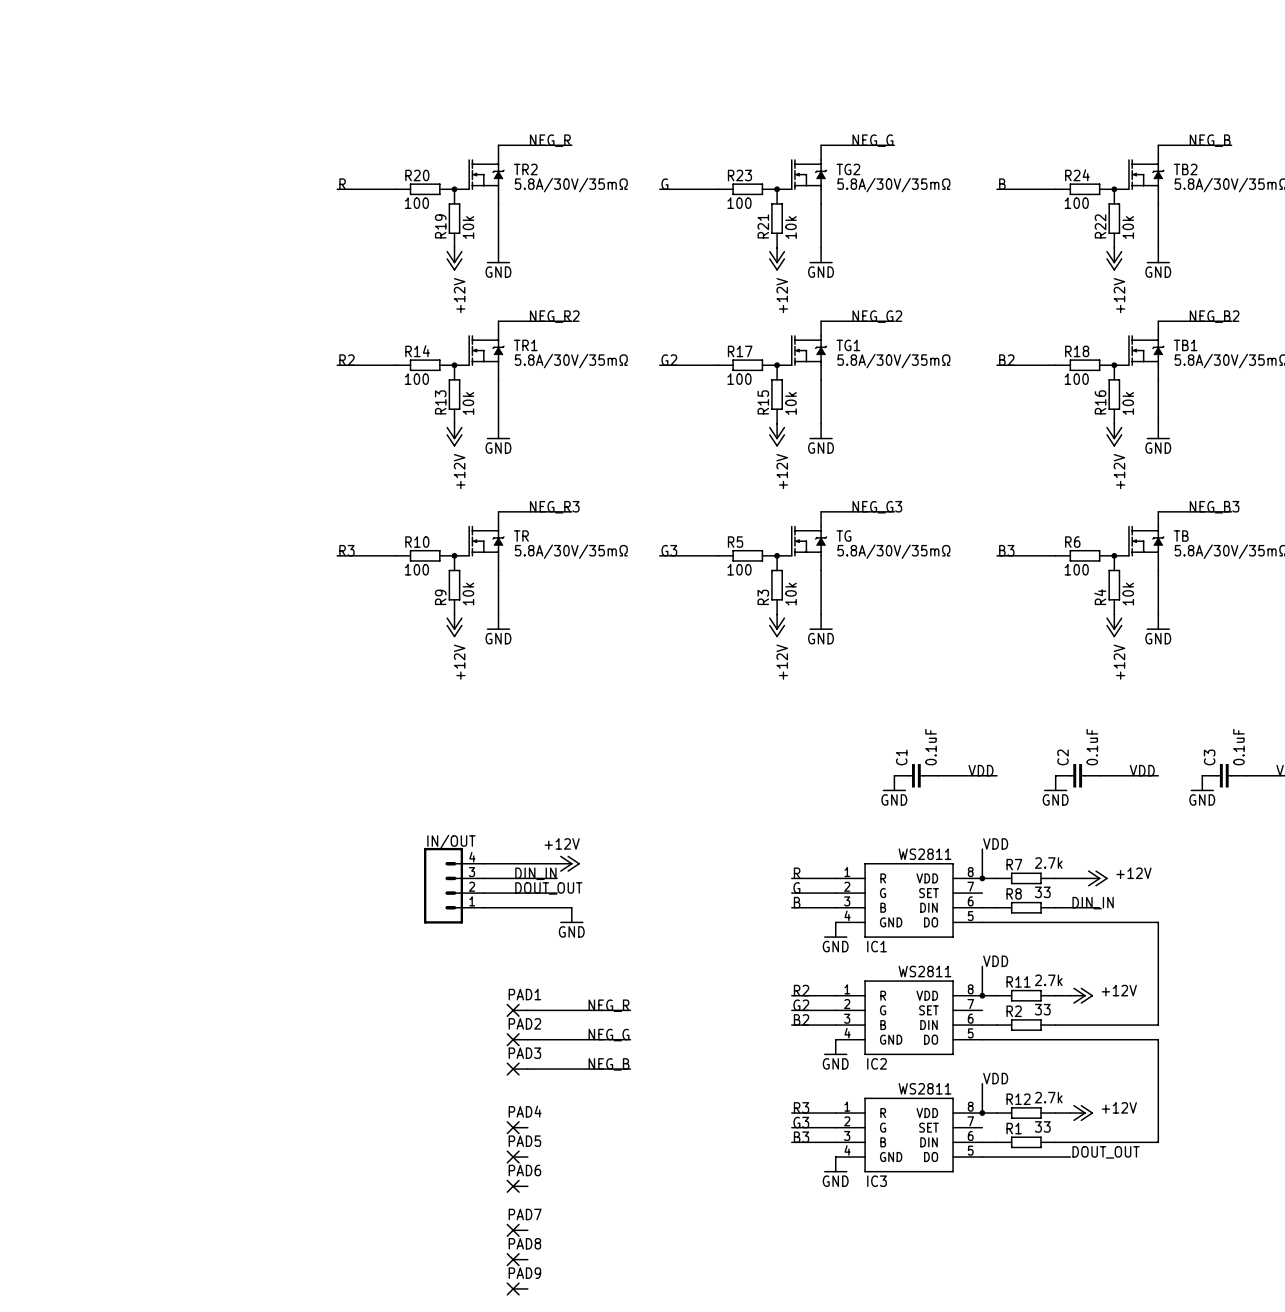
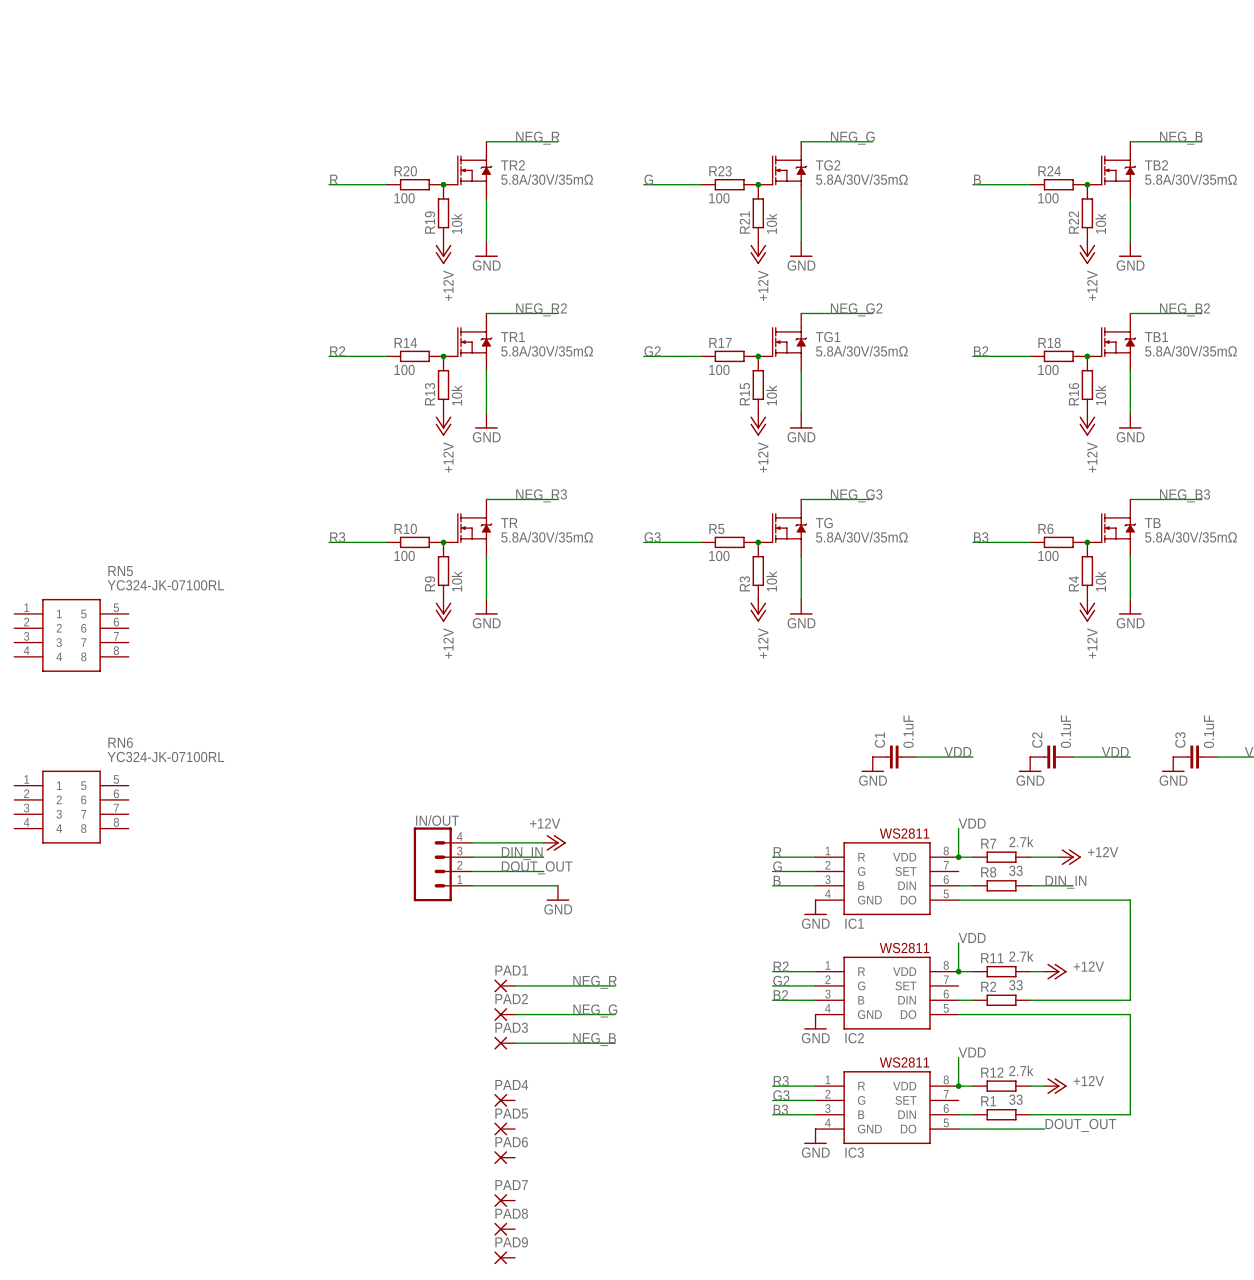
RN5: none -> YC324-JK-07100RL (71, 635)
RN6: none -> YC324-JK-07100RL (71, 807)

